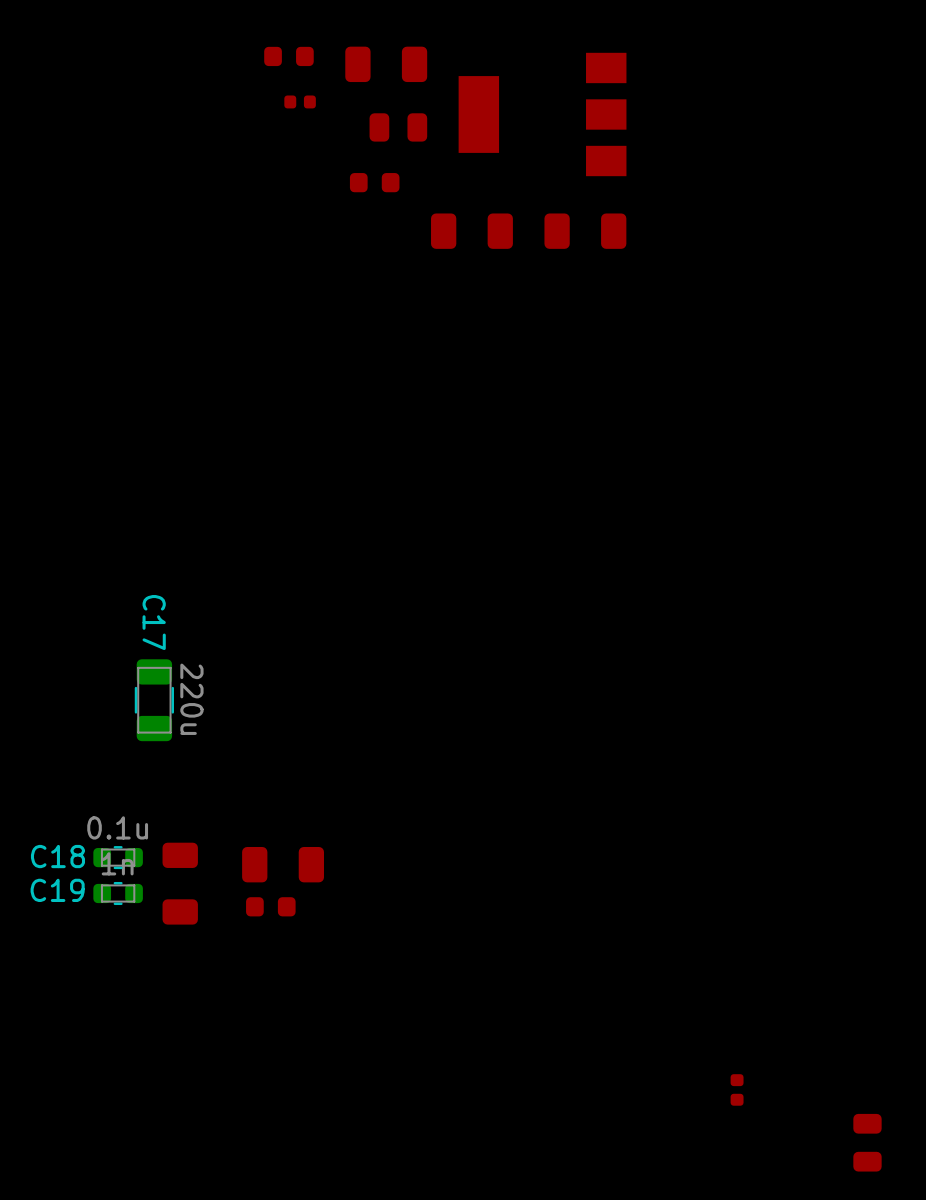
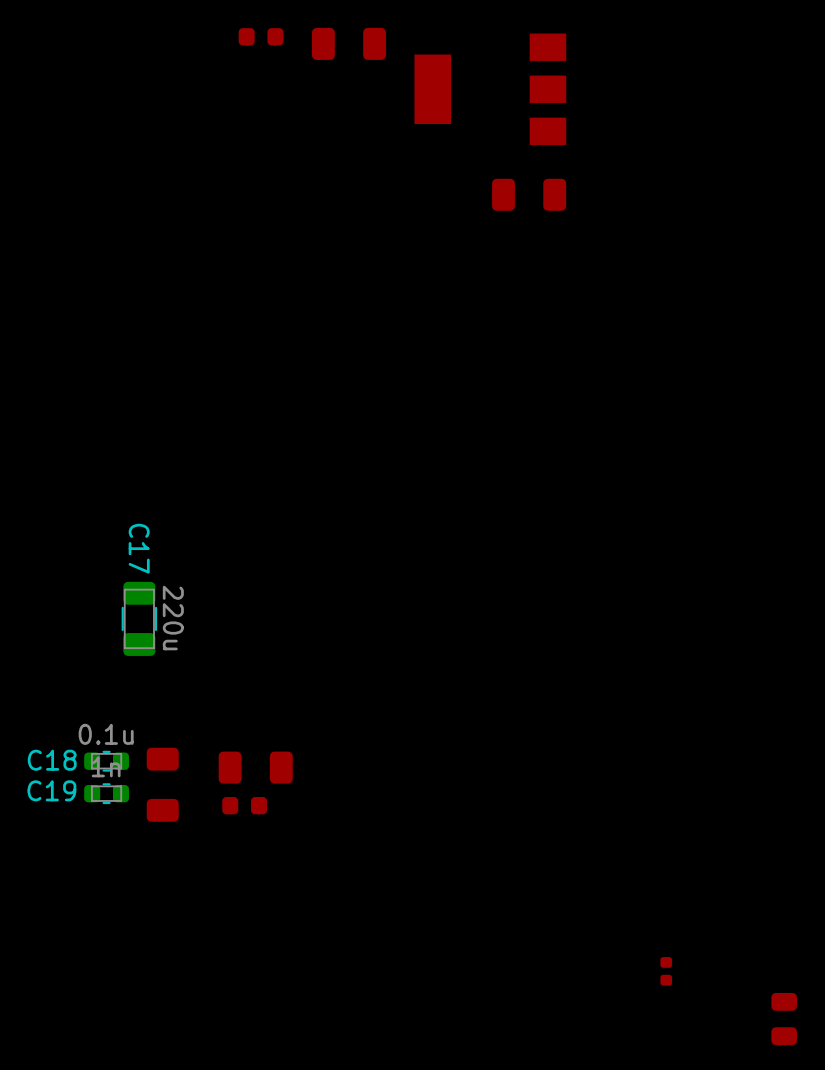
part: (300, 101) -> none
part: (398, 127) -> none
part: (374, 182) -> none
part: (471, 231) -> none

